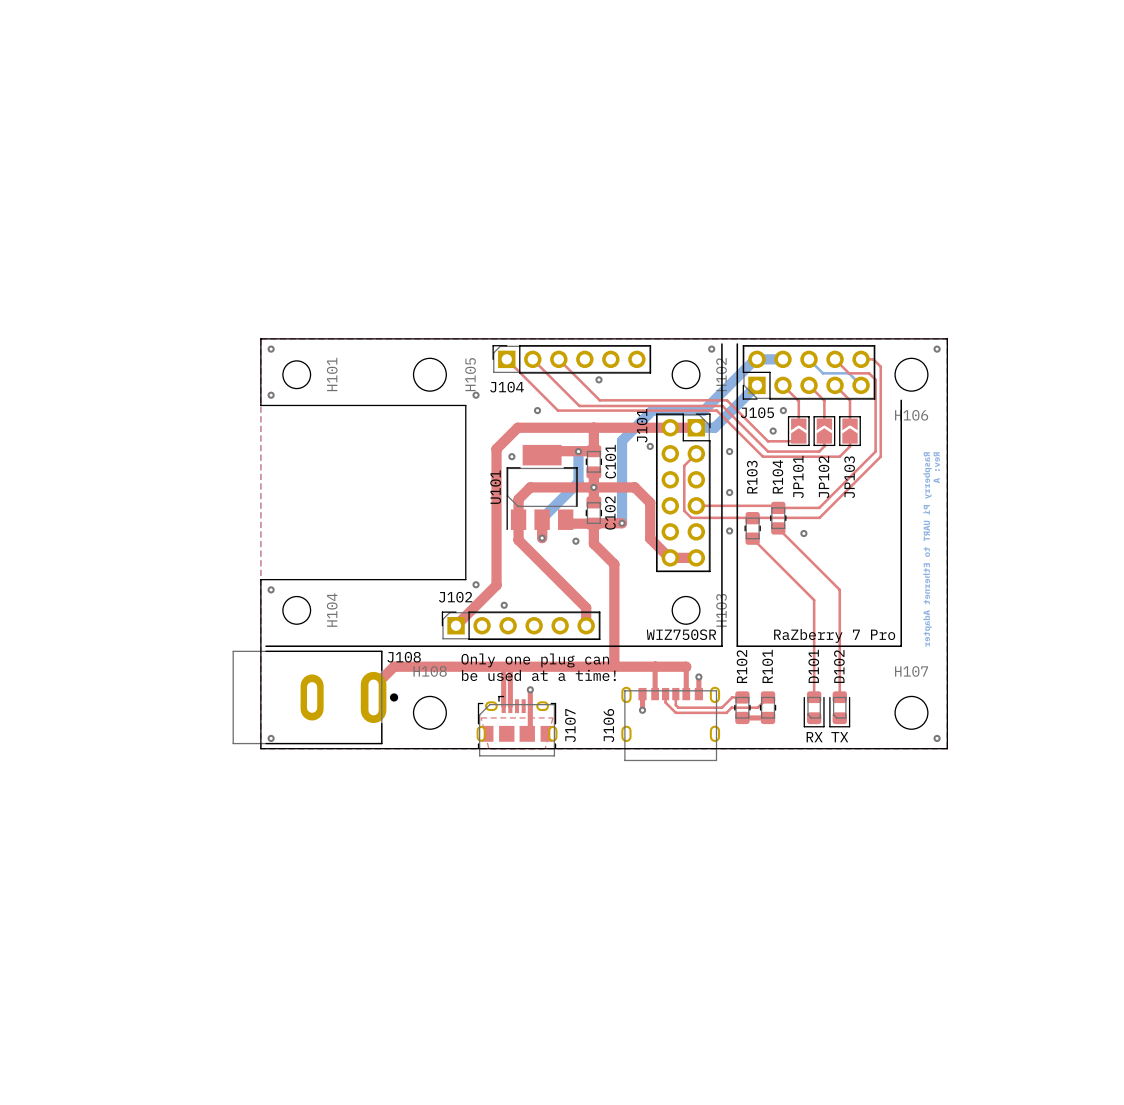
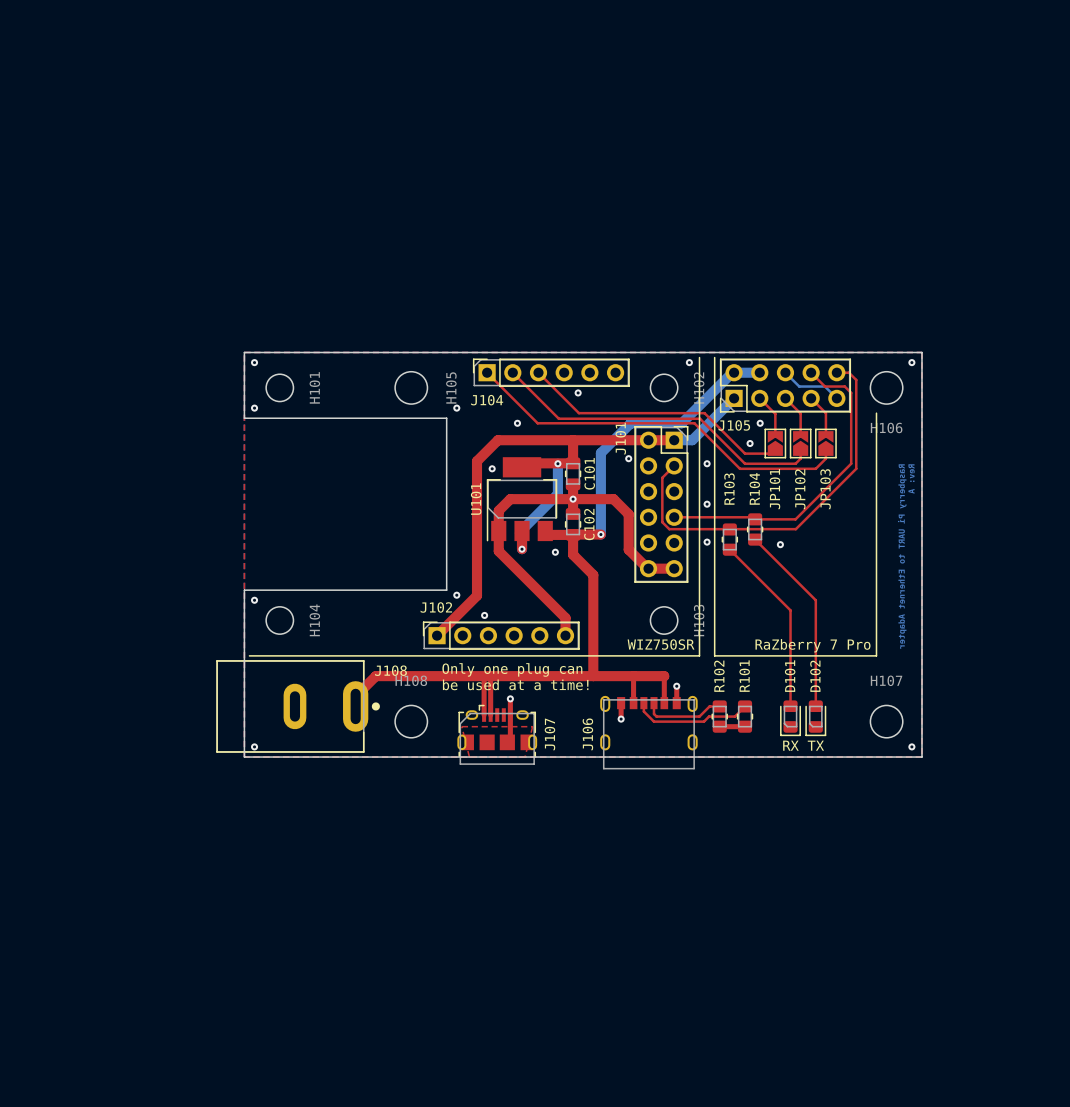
J108 footprint: [232, 650, 399, 745] -> [216, 660, 380, 753]

